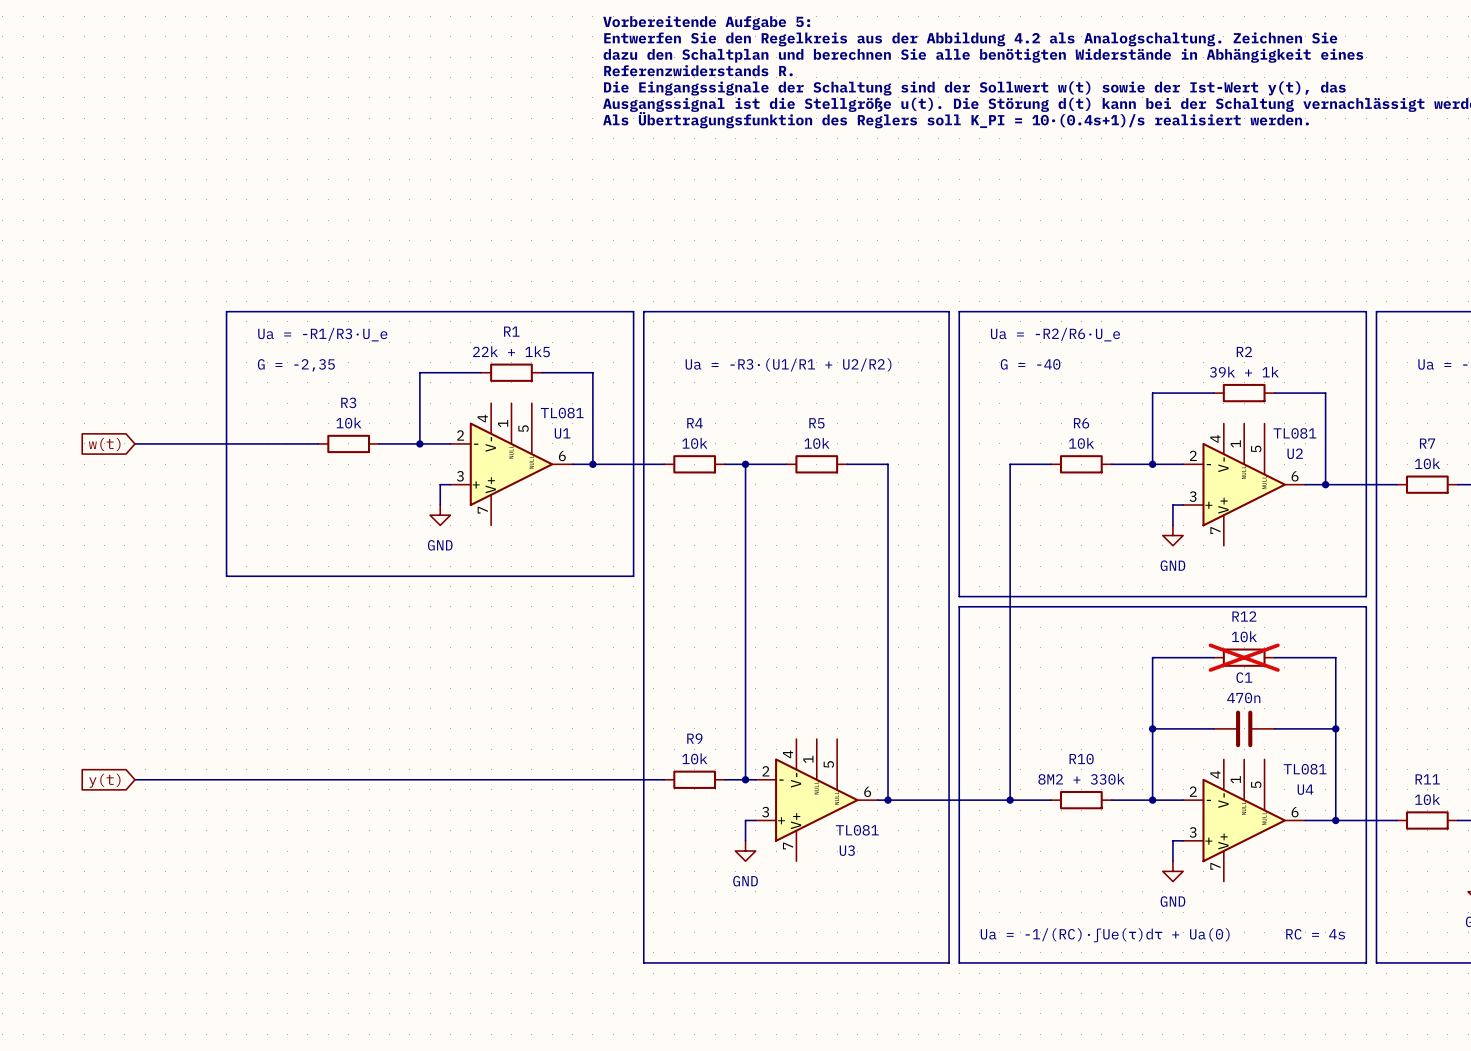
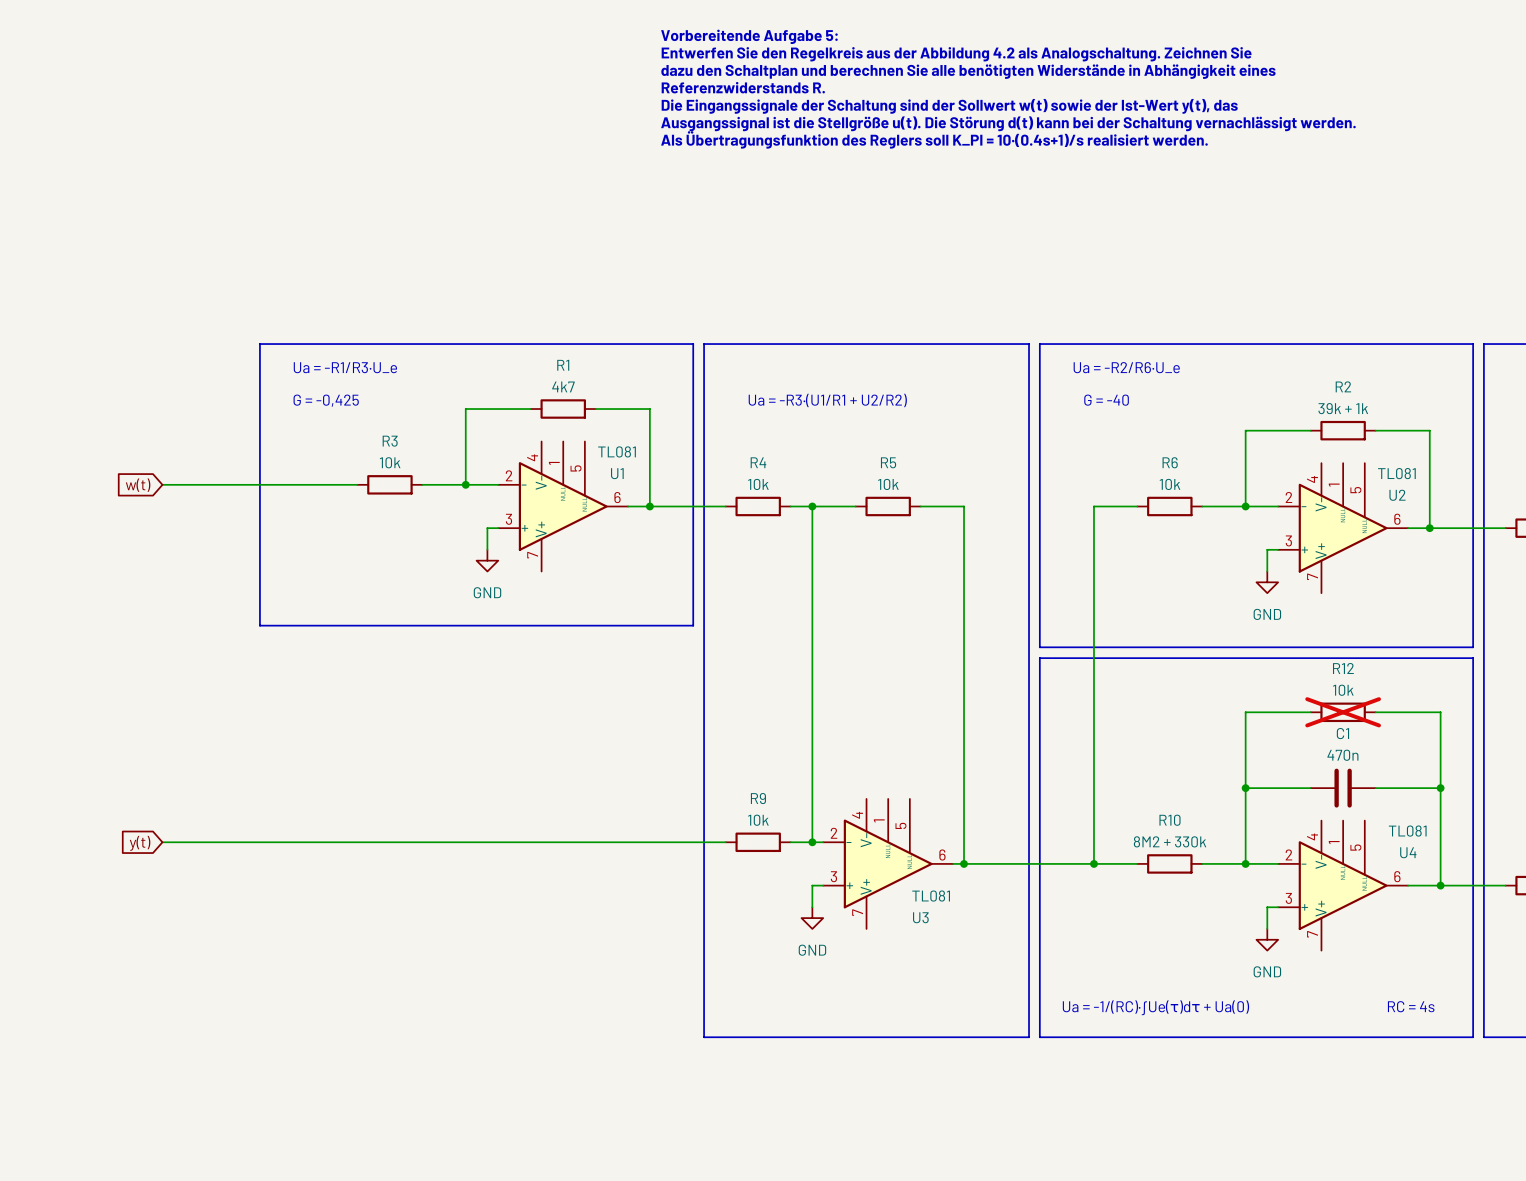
R1 value: 22k + 1k5 (511, 351) -> 4k7 (563, 386)
text: G = -2,35 (296, 365) -> G = -0,425 (326, 400)

